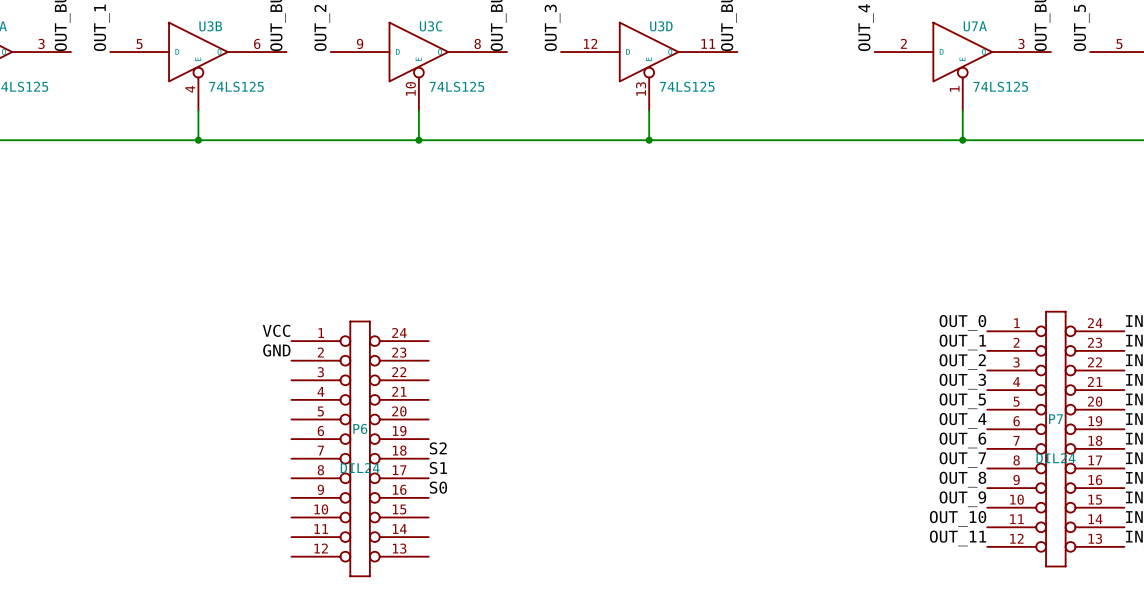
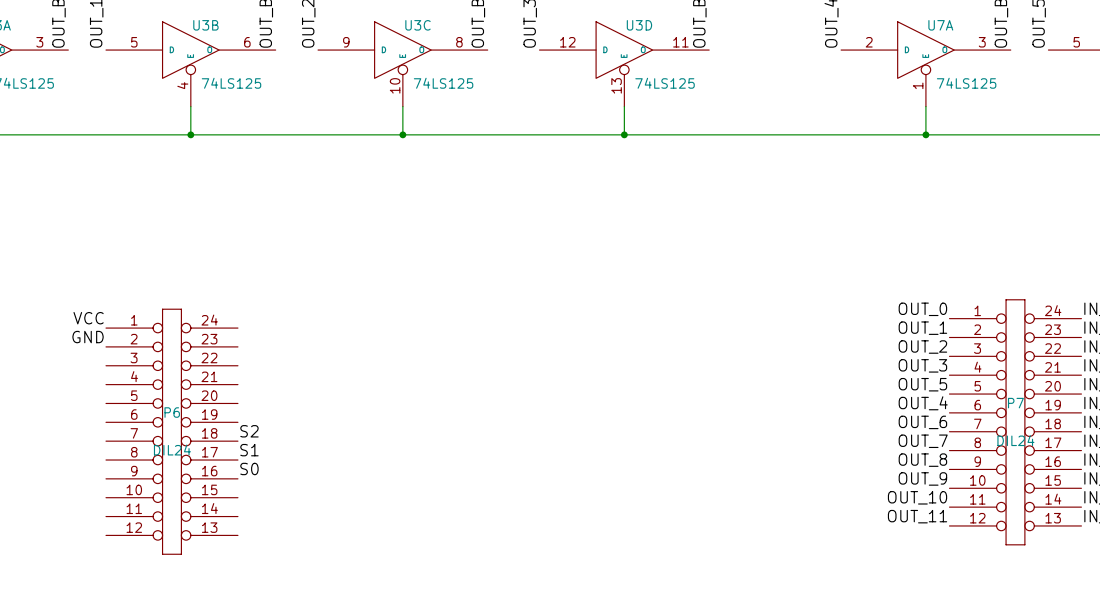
label position: VCC (276, 330) -> VCC (88, 318)
label position: GND (276, 350) -> GND (88, 337)
P6 position: (360, 448) -> (171, 431)
label position: S2 (438, 448) -> S2 (249, 431)
label position: S1 (438, 468) -> S1 (249, 450)
label position: S0 (438, 487) -> S0 (249, 468)

